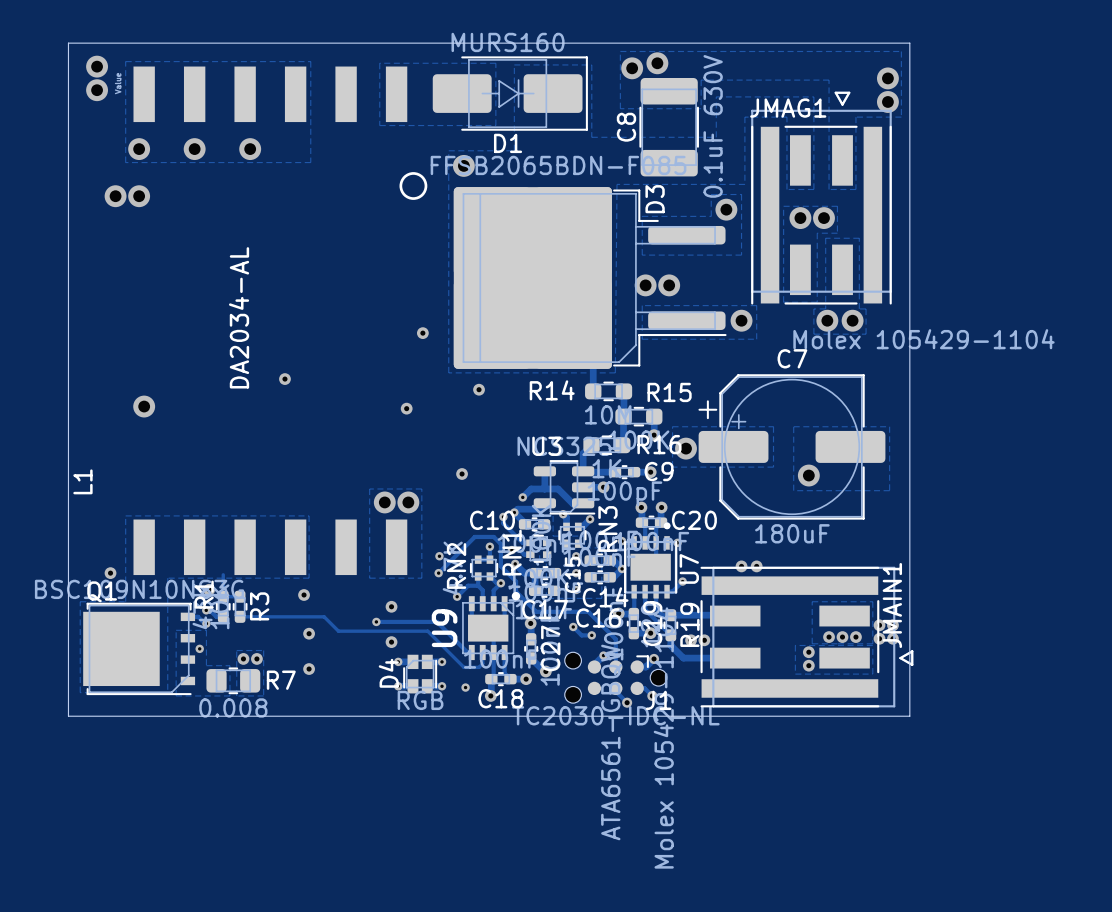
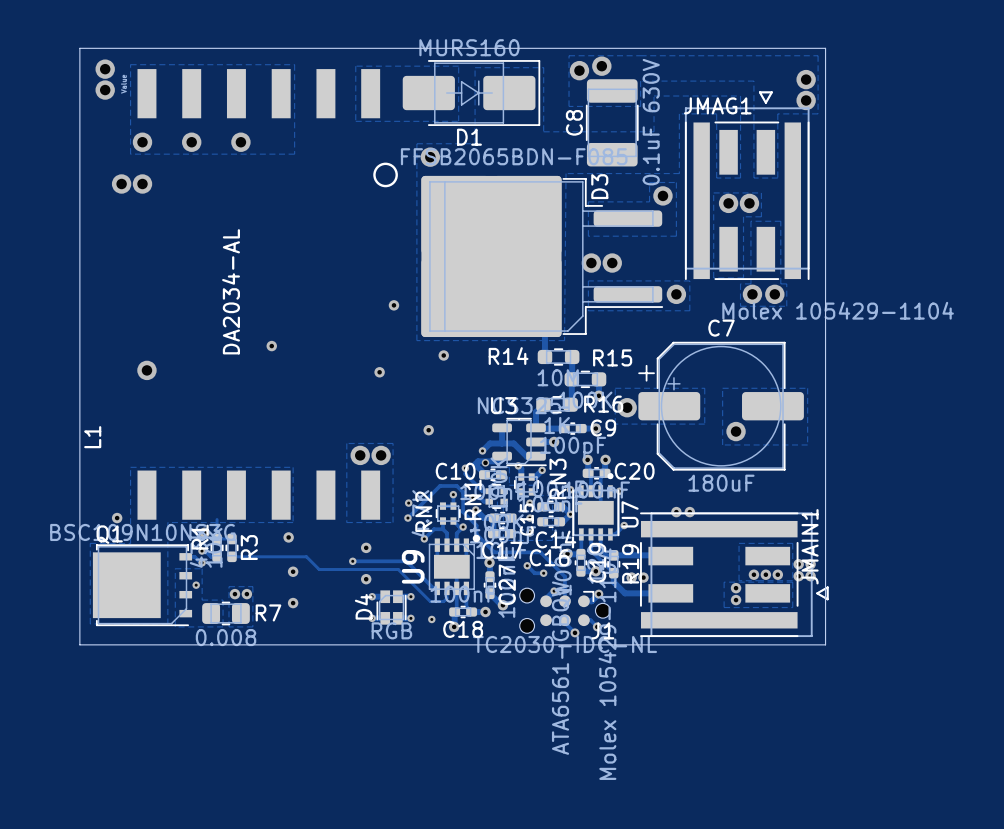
via: none -> (485, 462)
via: (514, 512) -> none

